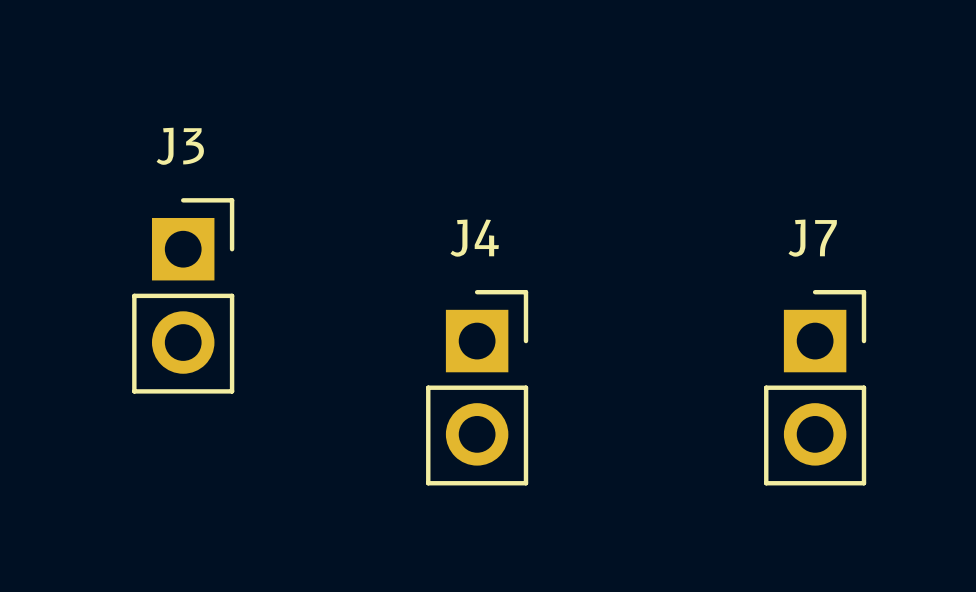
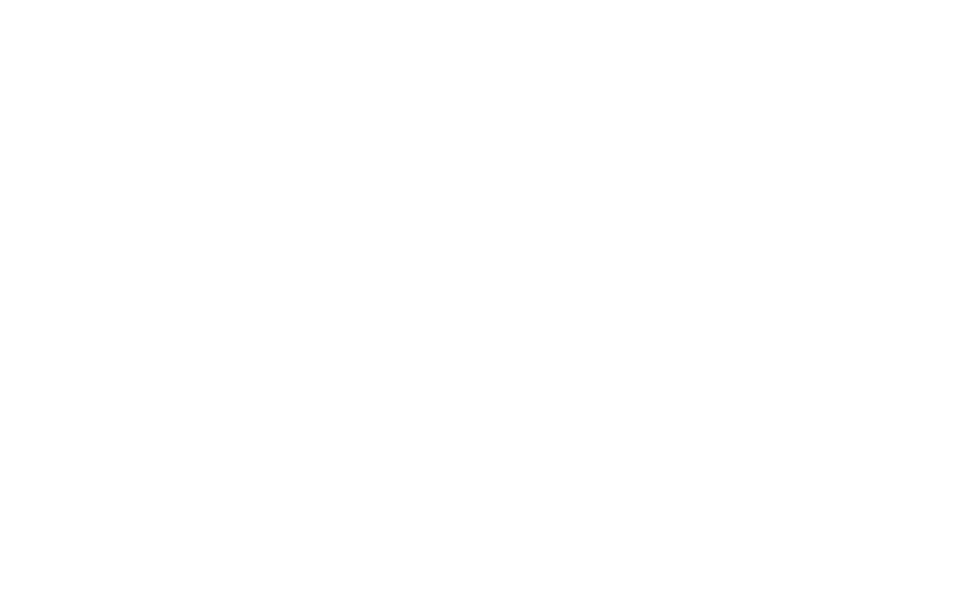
J3: (183, 295) -> none
J4: (477, 387) -> none
J7: (815, 387) -> none

